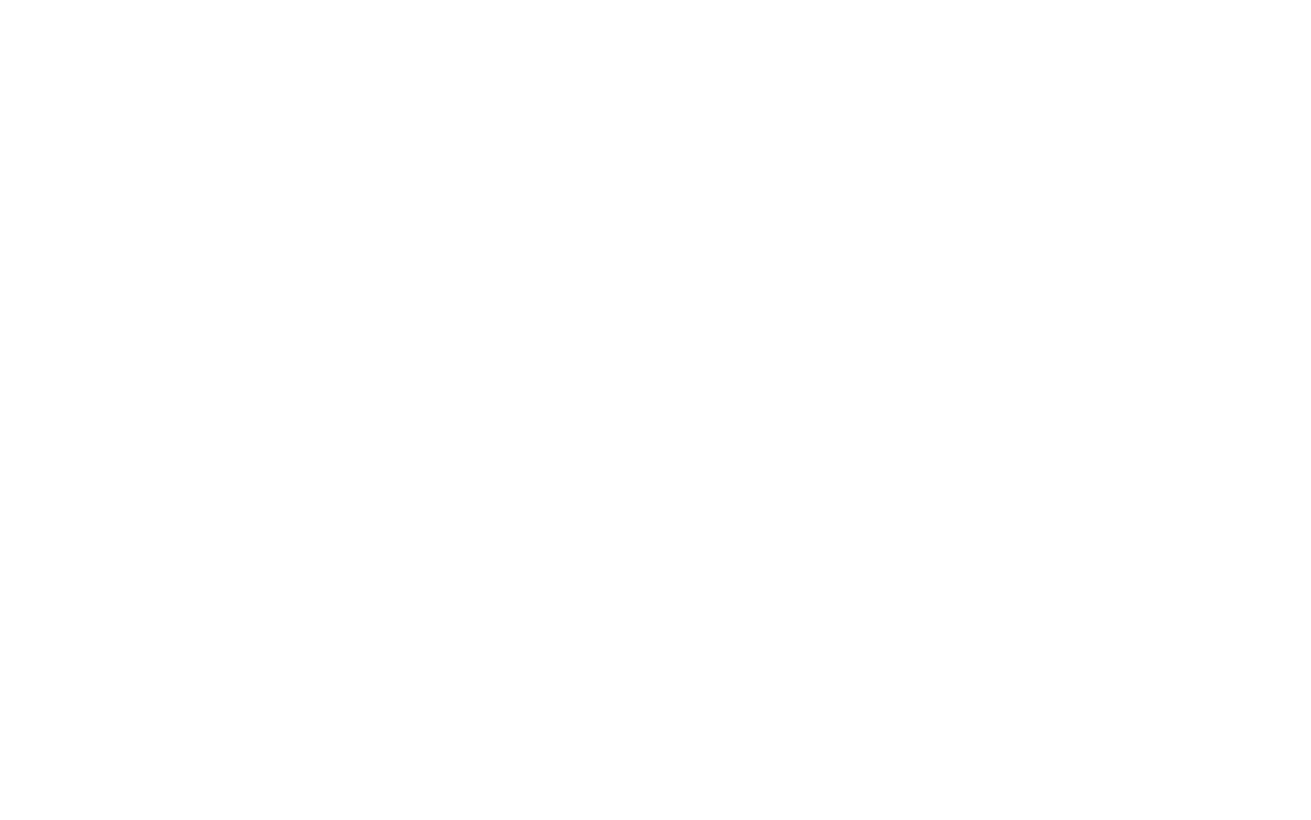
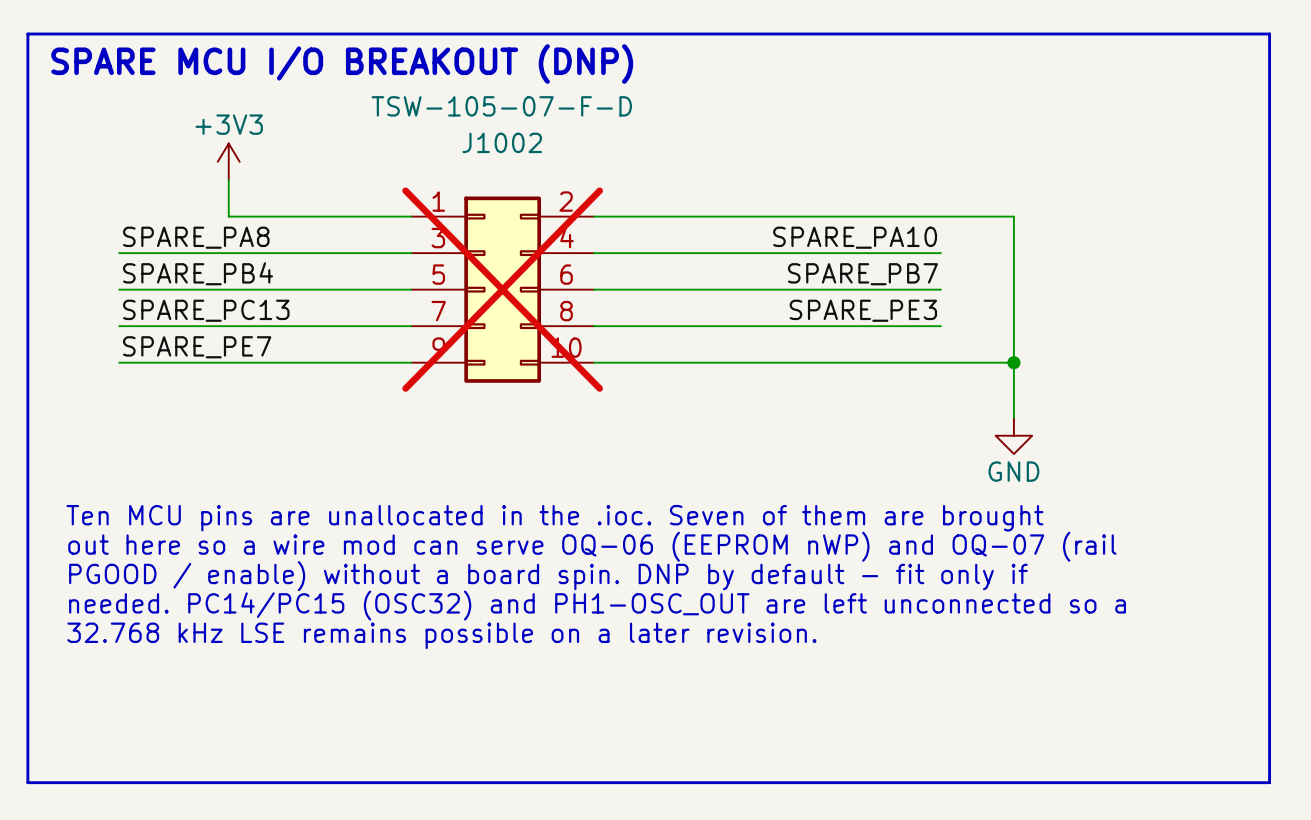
line: none -> (27, 34) (1269, 34) (1269, 782) (27, 782) (27, 34)
text: none -> SPARE MCU I/O BREAKOUT (DNP) (342, 64)
power symbol: none -> +3V3 (228, 161)
wire: none -> (228, 180) (228, 216) (411, 216)
wire: none -> (593, 216) (1013, 216) (1013, 417)
label: none -> SPARE_PA8 (196, 237)
label: none -> SPARE_PA10 (855, 237)
wire: none -> (119, 253) (411, 253)
wire: none -> (593, 253) (940, 253)
label: none -> SPARE_PB4 (198, 273)
label: none -> SPARE_PB7 (862, 274)
wire: none -> (119, 289) (411, 289)
J1002: none -> TSW-105-07-F-D (502, 289)
wire: none -> (593, 289) (940, 289)
label: none -> SPARE_PC13 (206, 310)
label: none -> SPARE_PE3 (863, 310)
wire: none -> (119, 326) (411, 326)
wire: none -> (593, 326) (940, 326)
label: none -> SPARE_PE7 (197, 347)
wire: none -> (119, 362) (411, 362)
wire: none -> (593, 362) (1013, 362)
junction: none -> (1013, 362)
power symbol: none -> GND (1013, 435)
text: none -> Ten MCU pins are unallocated in the .ioc. Seven of them are brought (554, 518)
text: none -> out here so a wire mod can serve OQ-06 (EEPROM nWP) and OQ-07 (rail (592, 546)
text: none -> PGOOD / enable) without a board spin. DNP by default - fit only if (548, 576)
text: none -> needed. PC14/PC15 (OSC32) and PH1-OSC_OUT are left unconnected so a (597, 605)
text: none -> 32.768 kHz LSE remains possible on a later revision. (441, 635)

